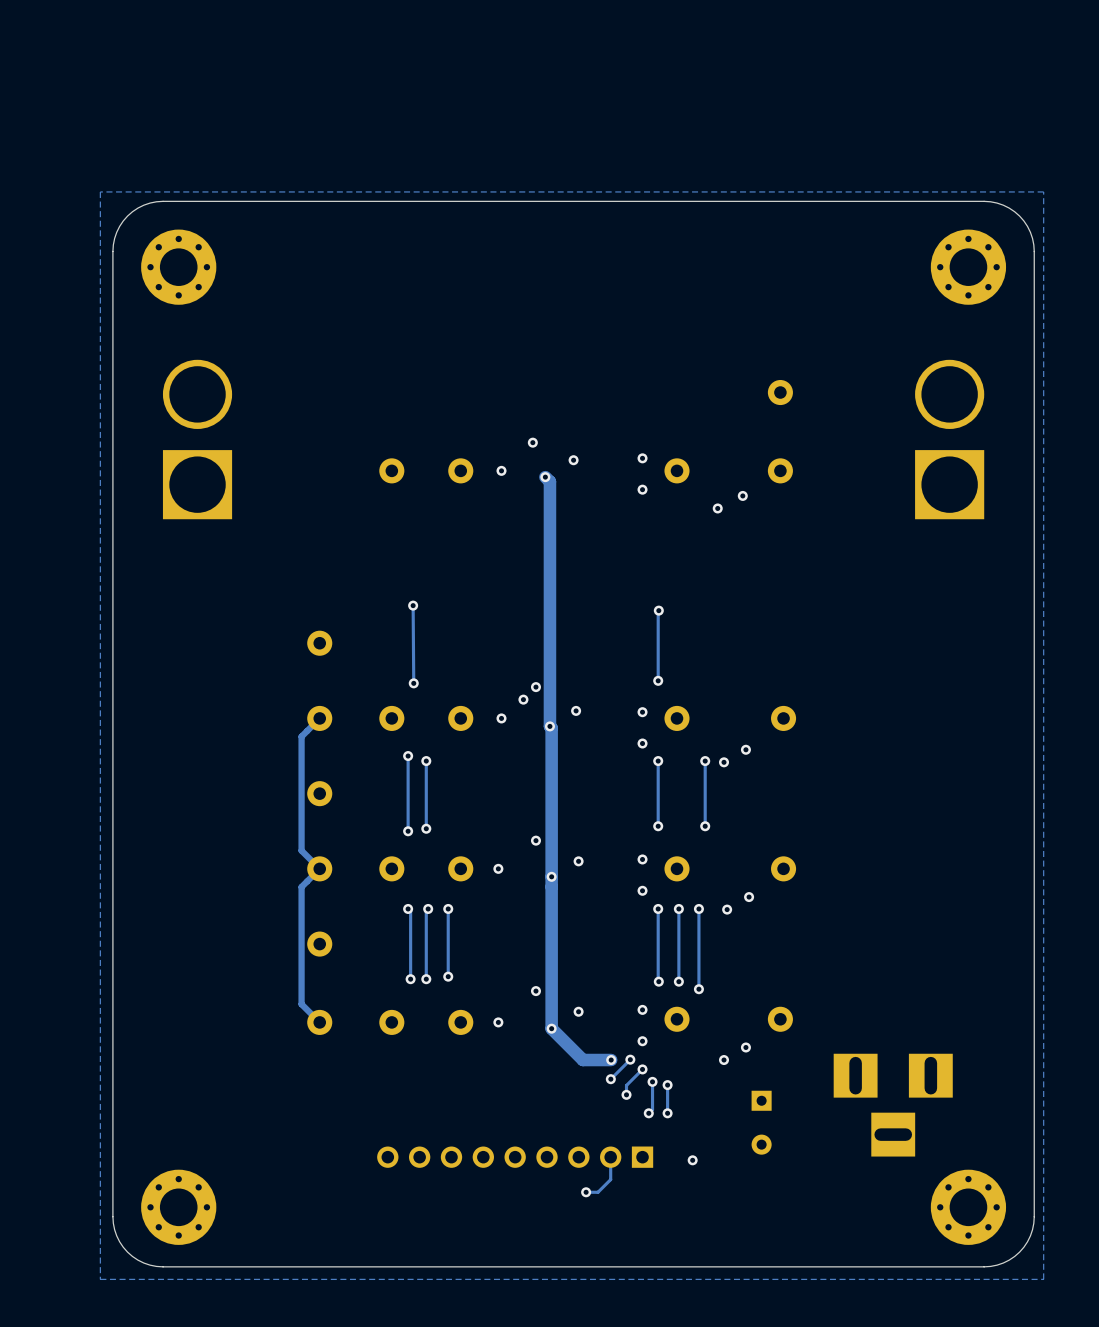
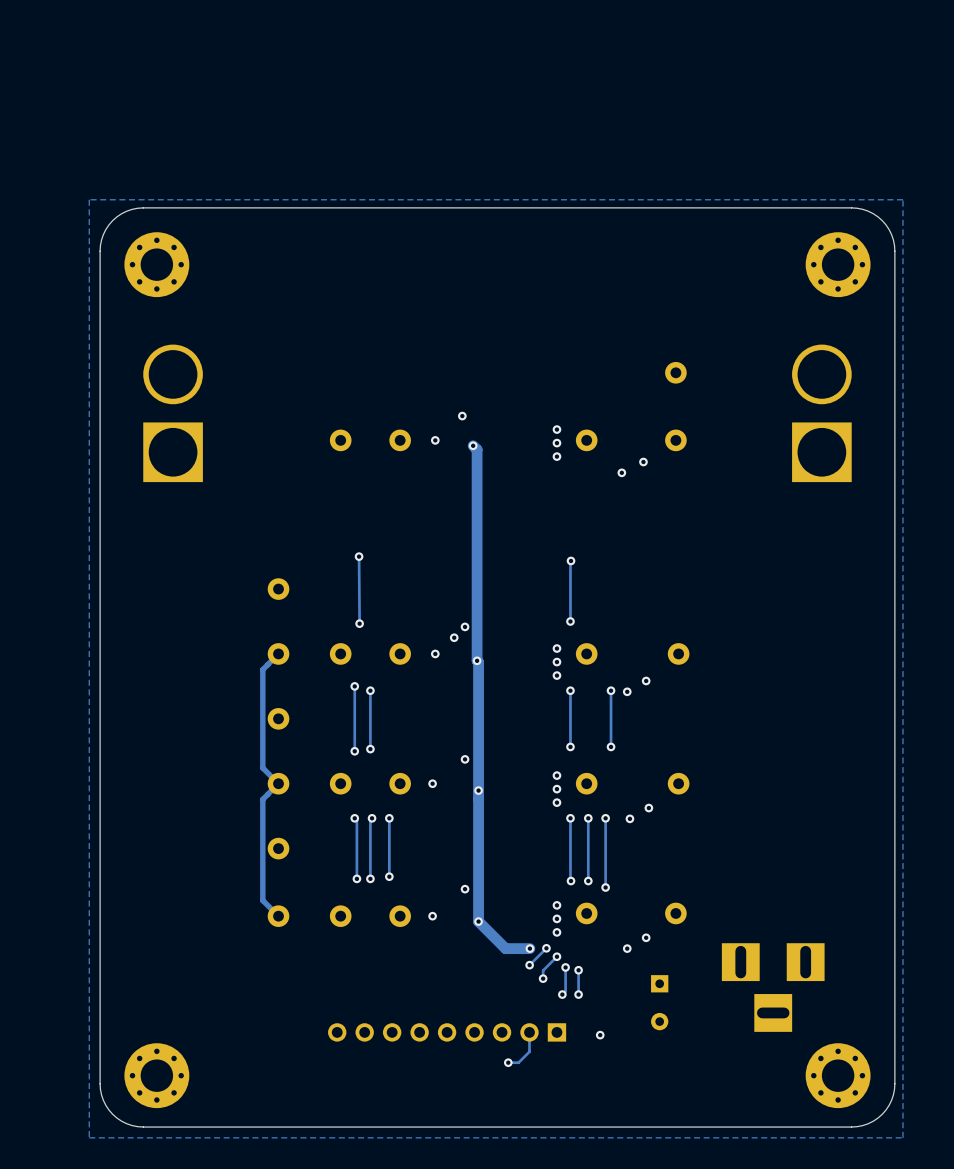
via position: (573, 460) -> (556, 443)
via position: (576, 710) -> (556, 662)
via position: (578, 861) -> (556, 789)
via position: (578, 1011) -> (556, 918)

